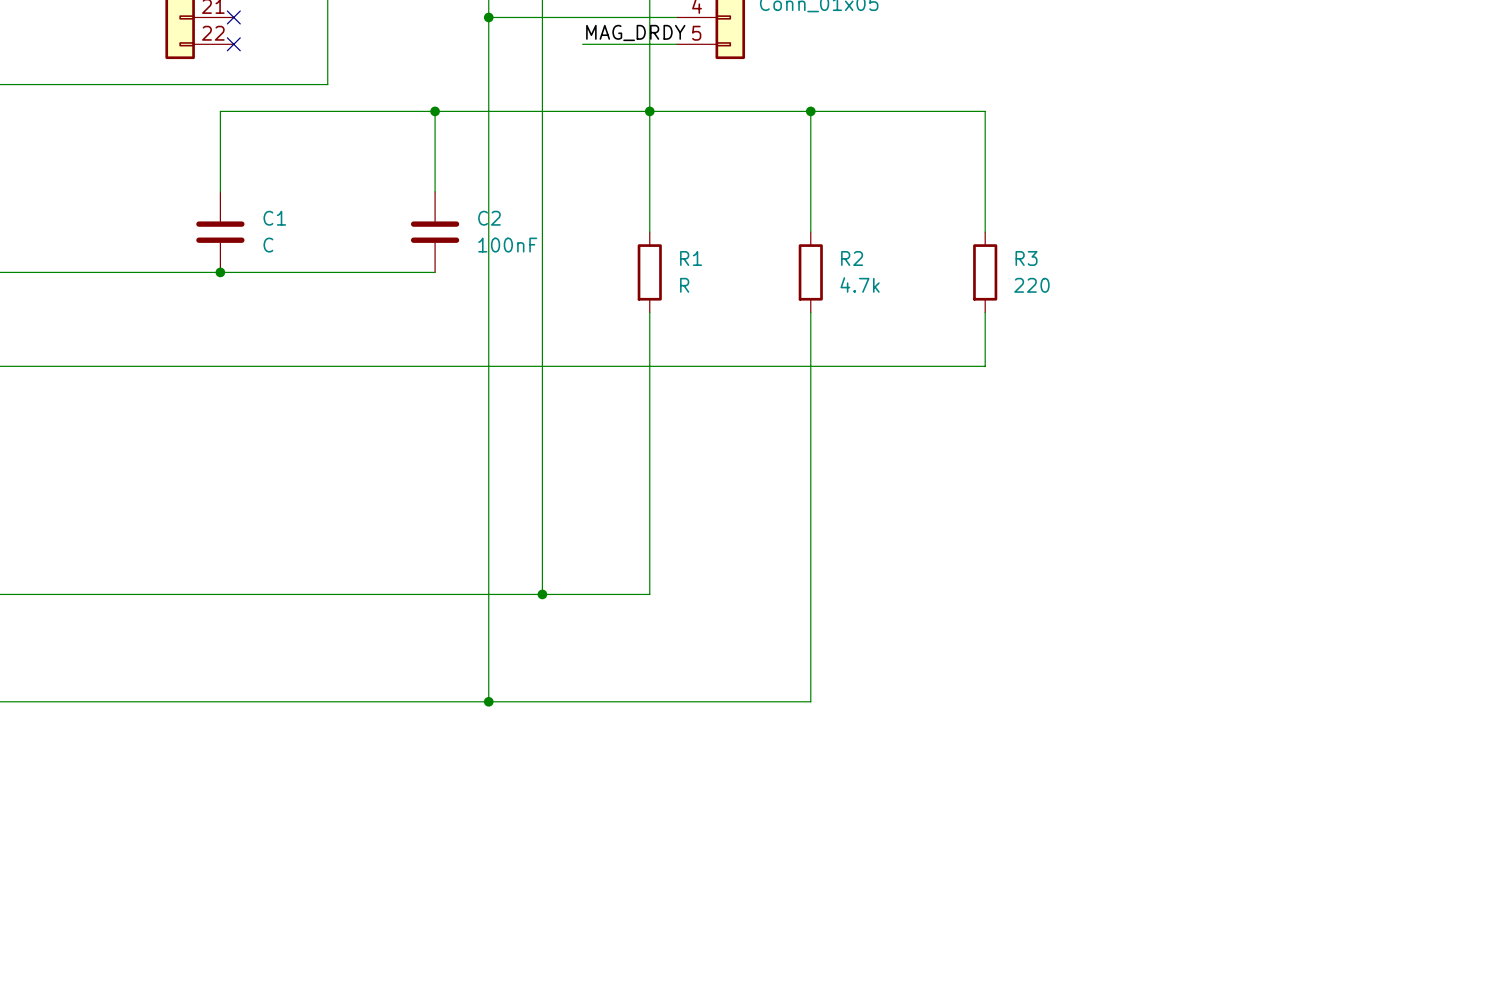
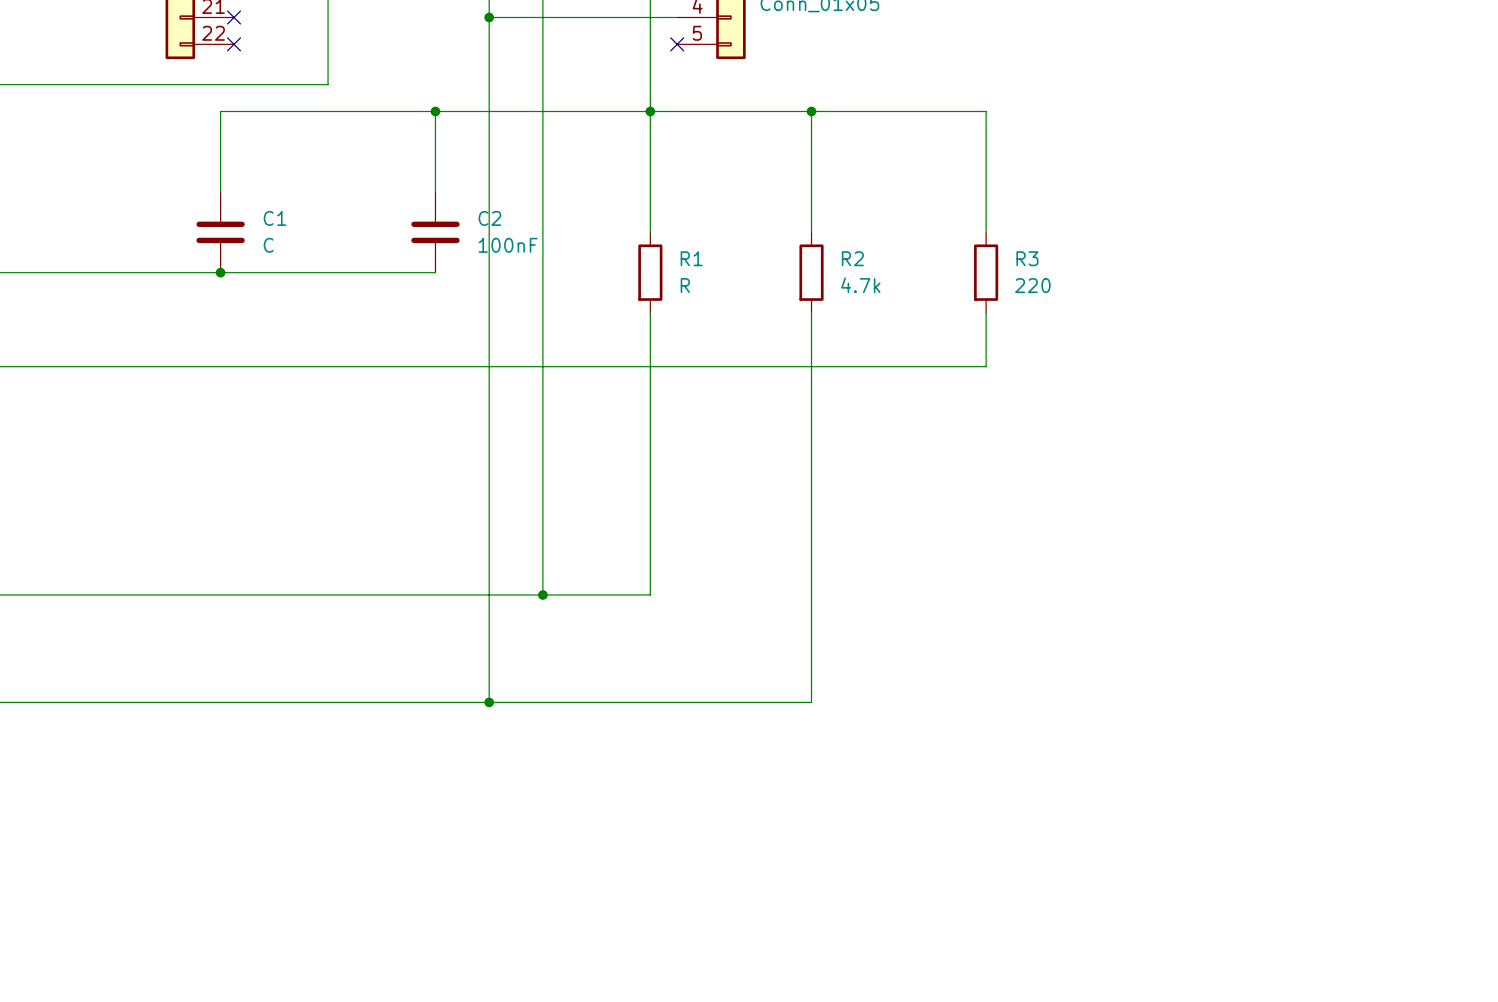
label: MAG_DRDY (635, 32) -> none
wire: (582, 44) (676, 44) -> none
no-connect mark: none -> (677, 44)

